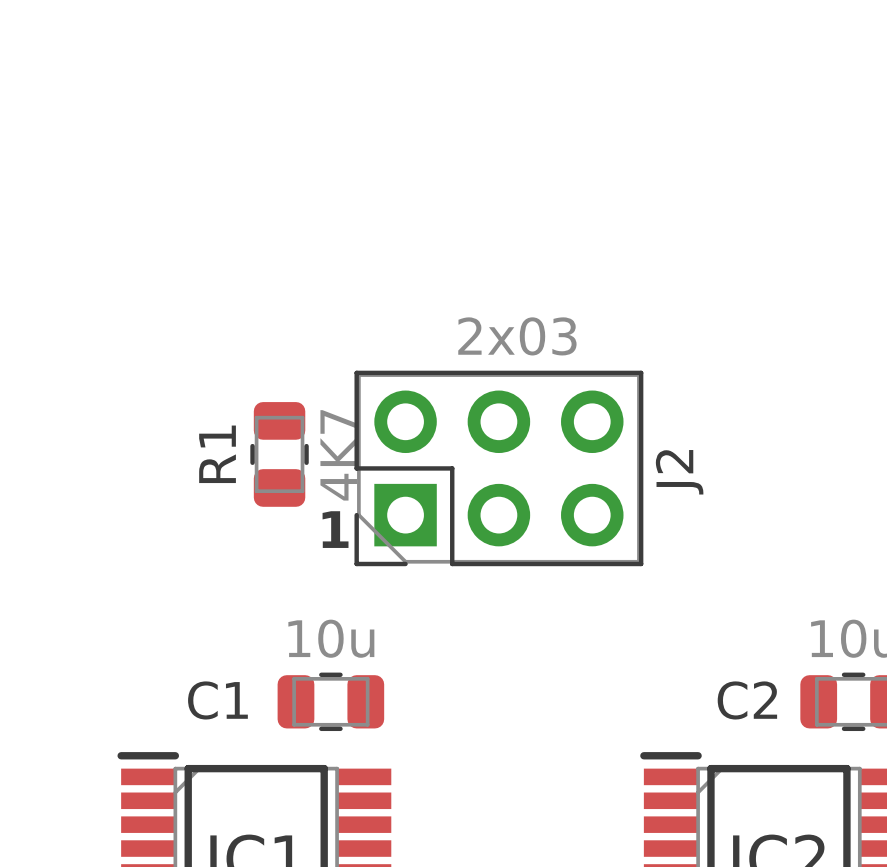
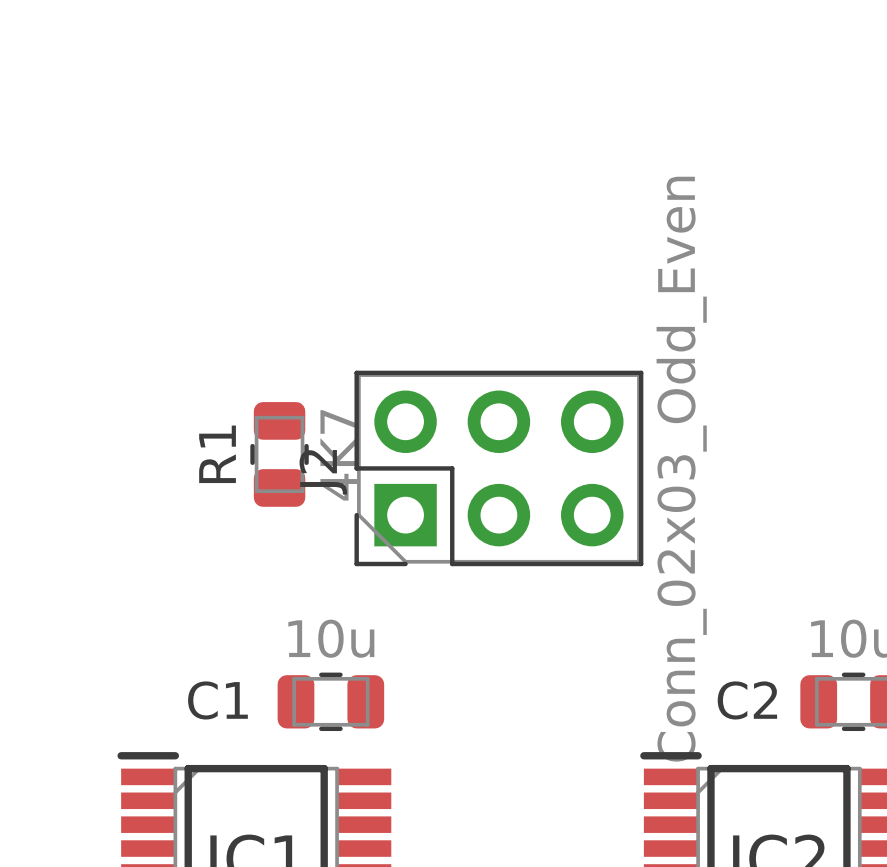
J2 value: 2x03 (517, 336) -> Conn_02x03_Odd_Even (681, 469)
J2 name position: J2 (679, 472) -> J2 (323, 472)
text: 1 (335, 529) -> none

